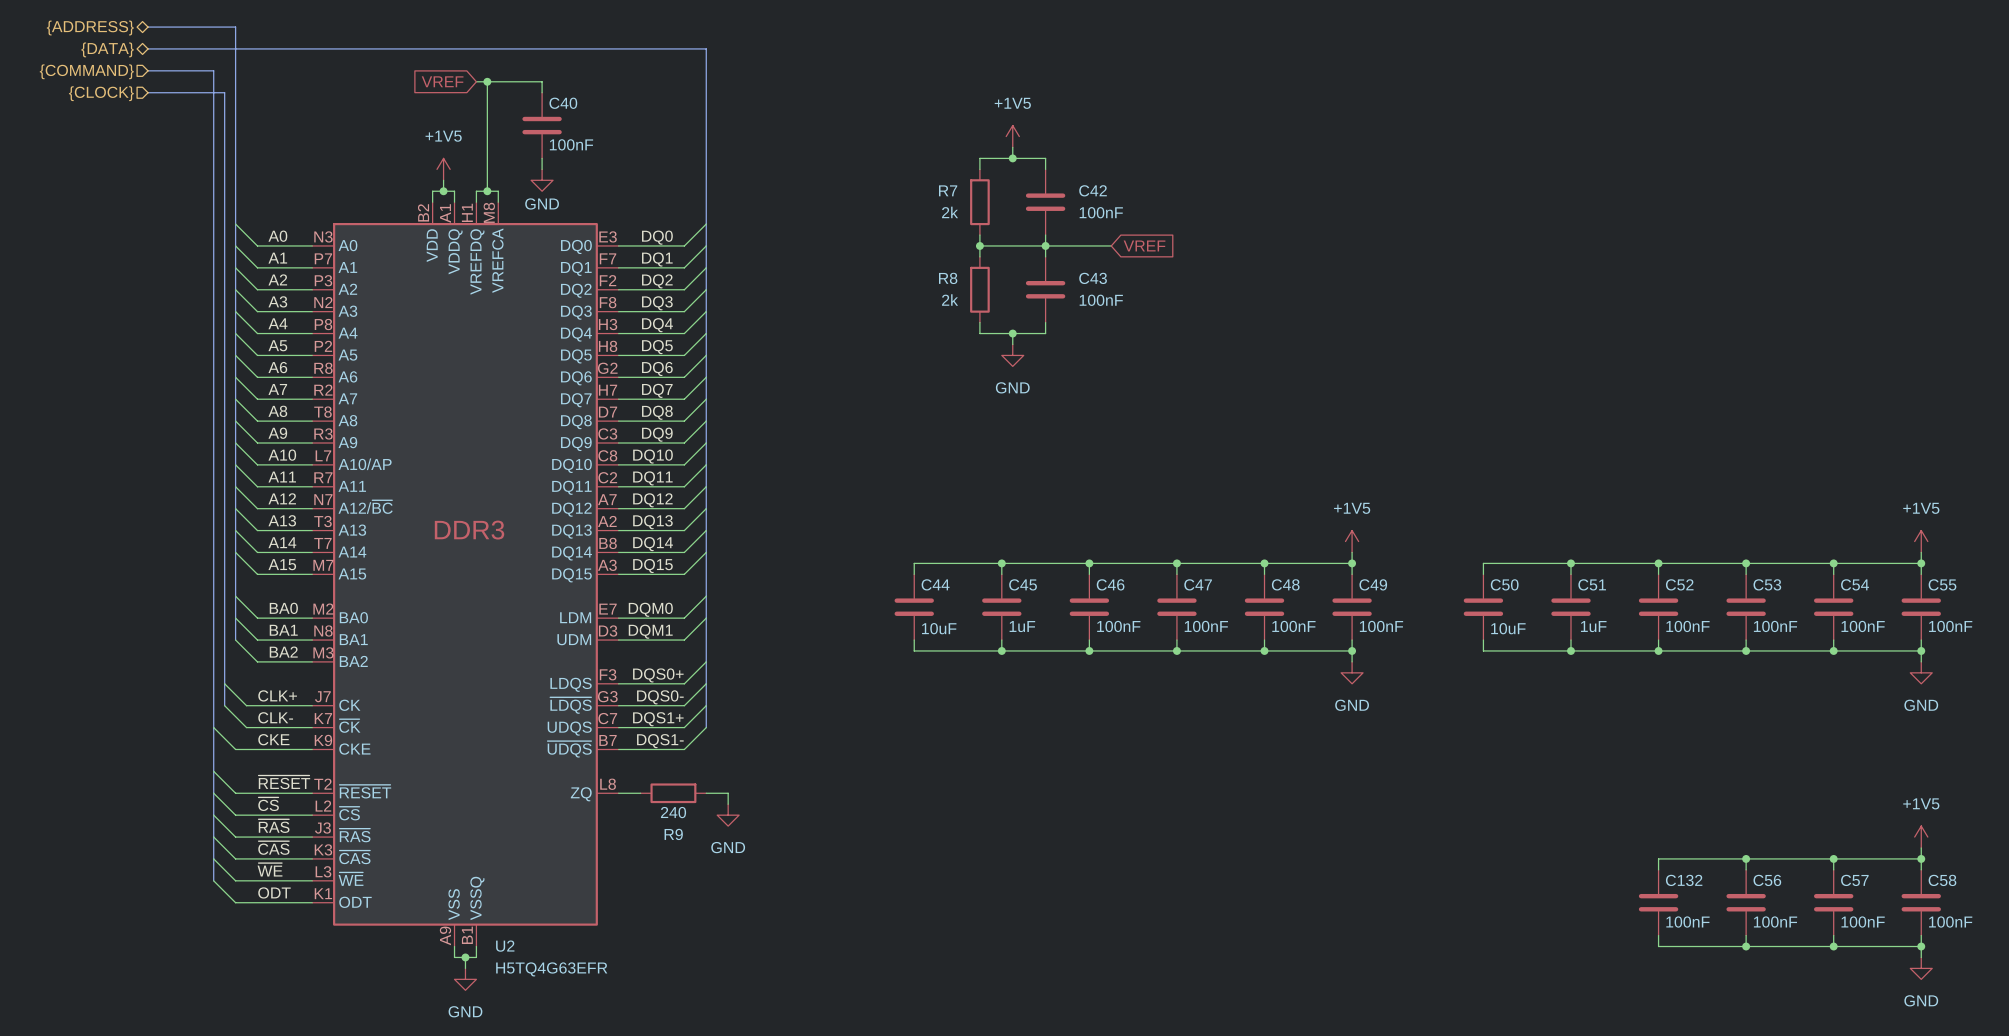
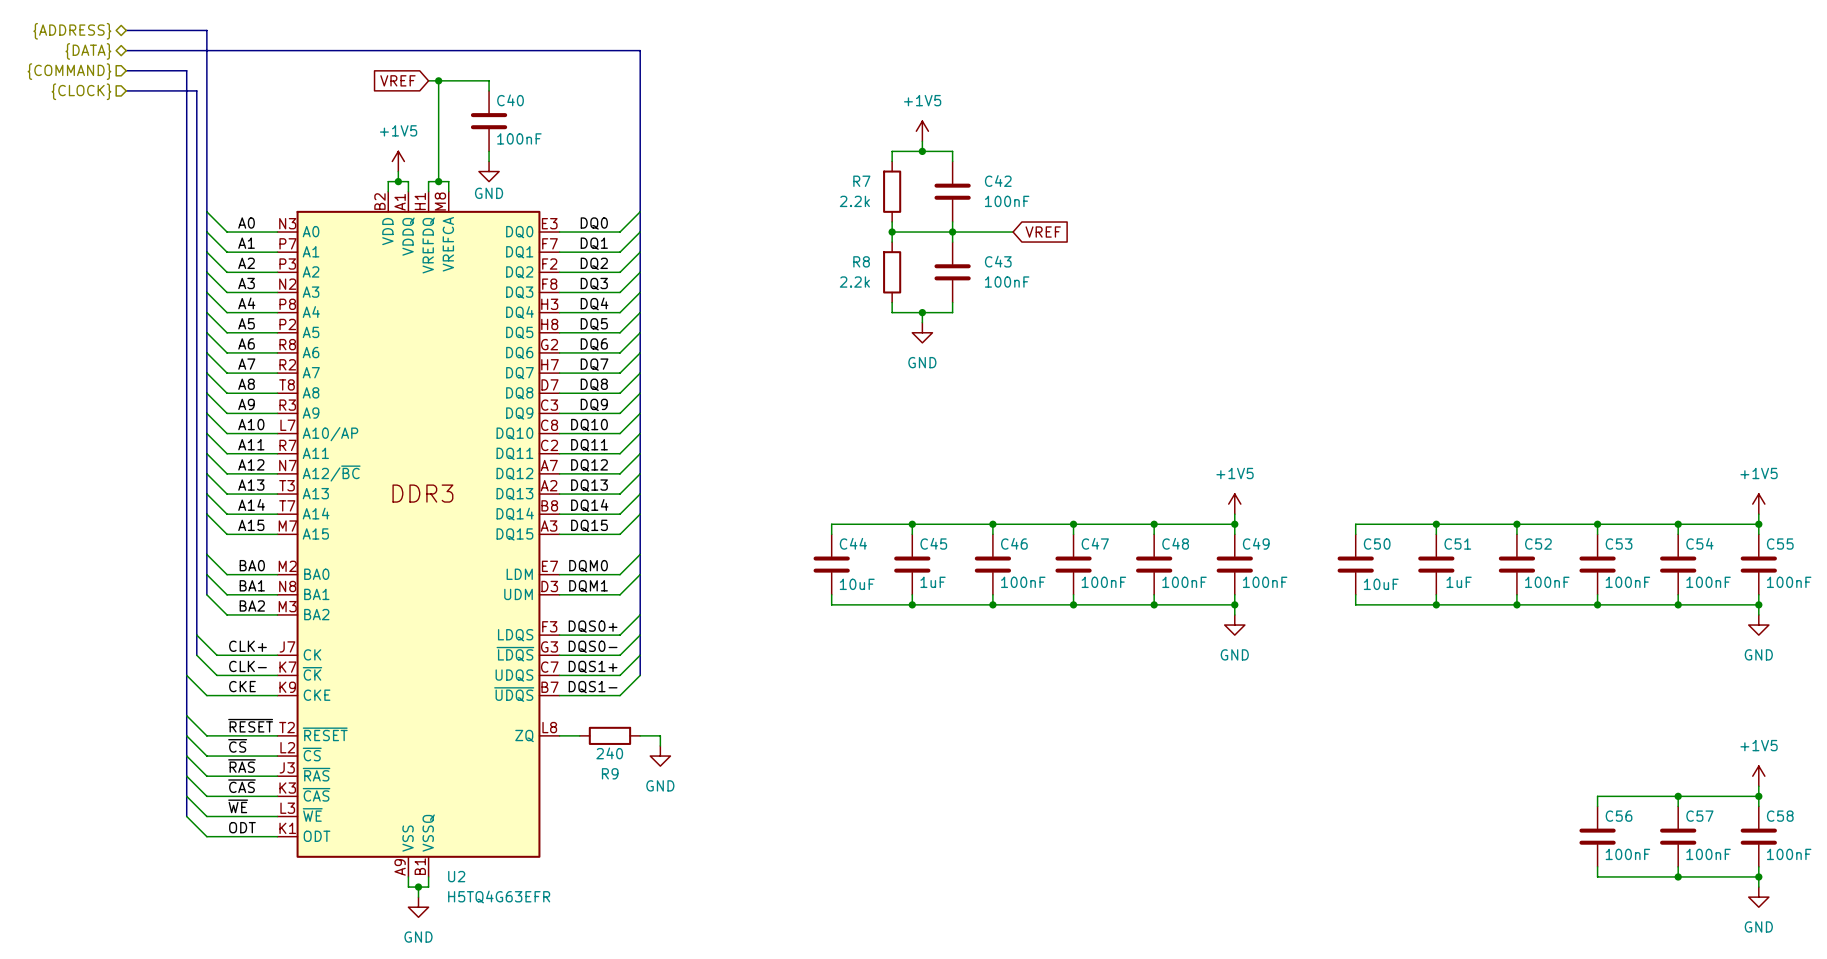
R7 value: 2k (950, 212) -> 2.2k (854, 201)
R8 value: 2k (950, 300) -> 2.2k (854, 282)
wire: (1746, 858) (1658, 858) (1658, 869) -> none
junction: (1746, 858) -> none
C132: 100nF (1658, 902) -> none
wire: (1658, 935) (1658, 946) (1746, 946) -> none
junction: (1746, 946) -> none

